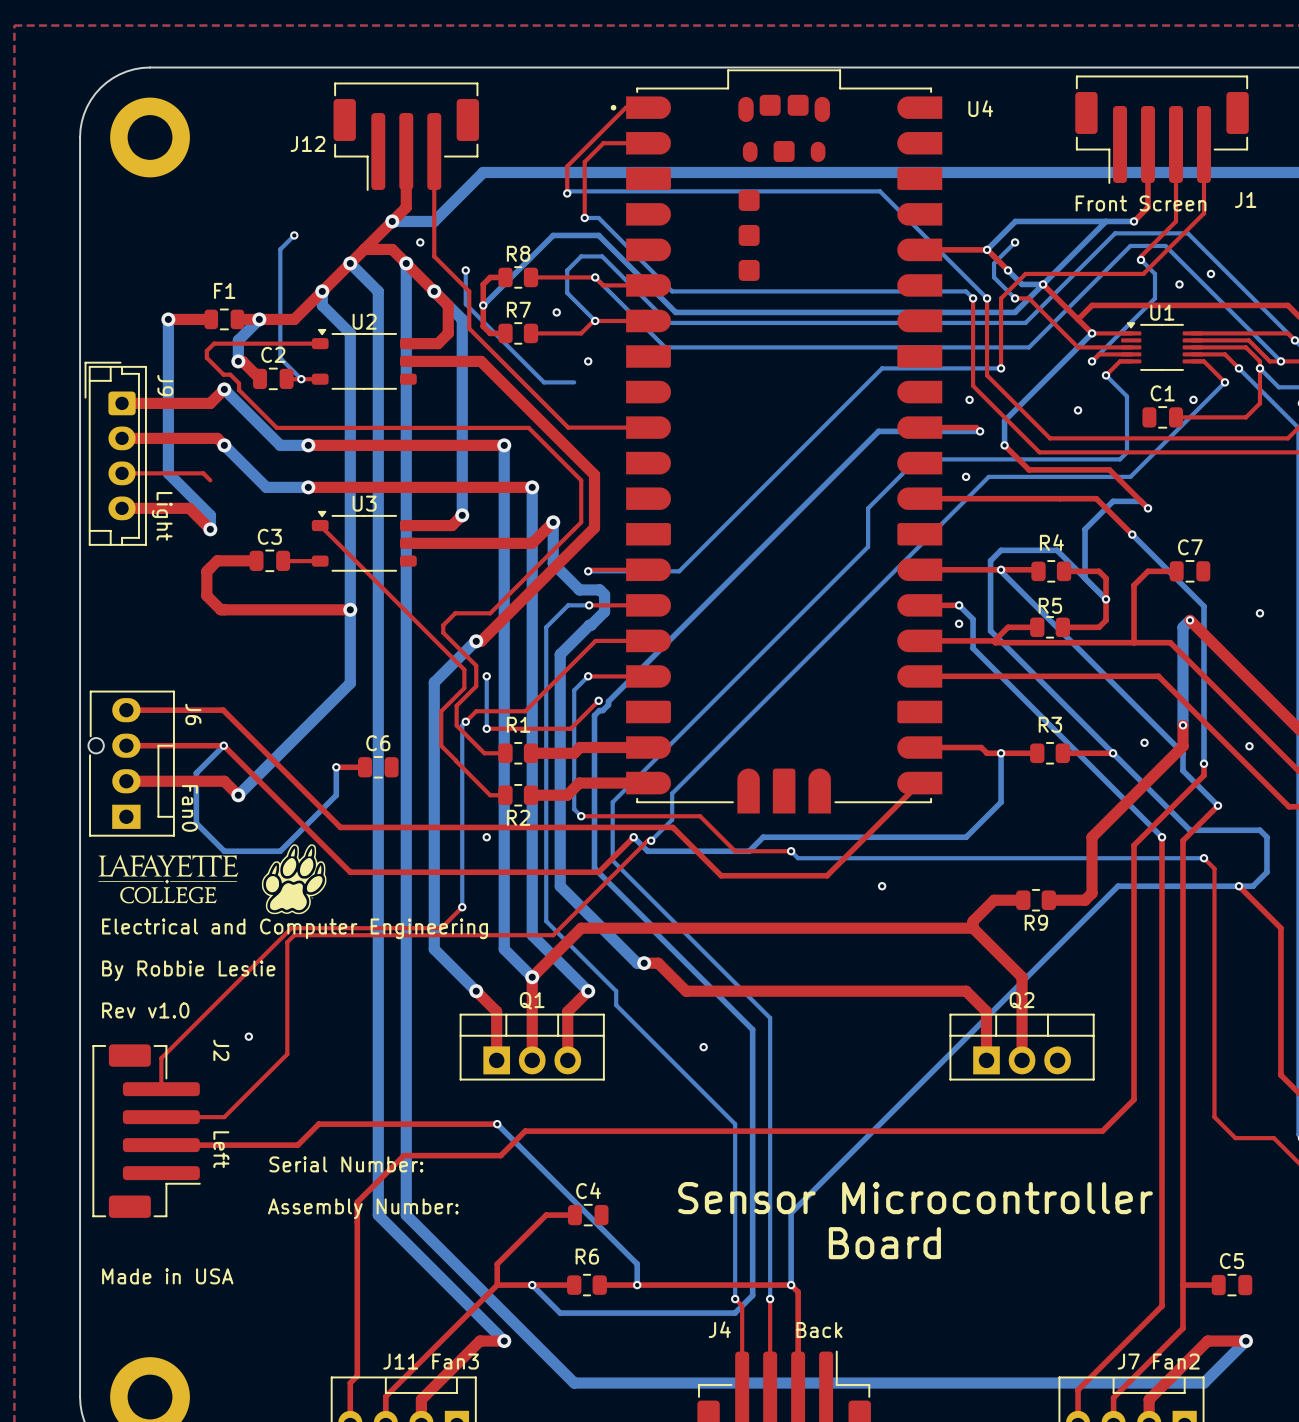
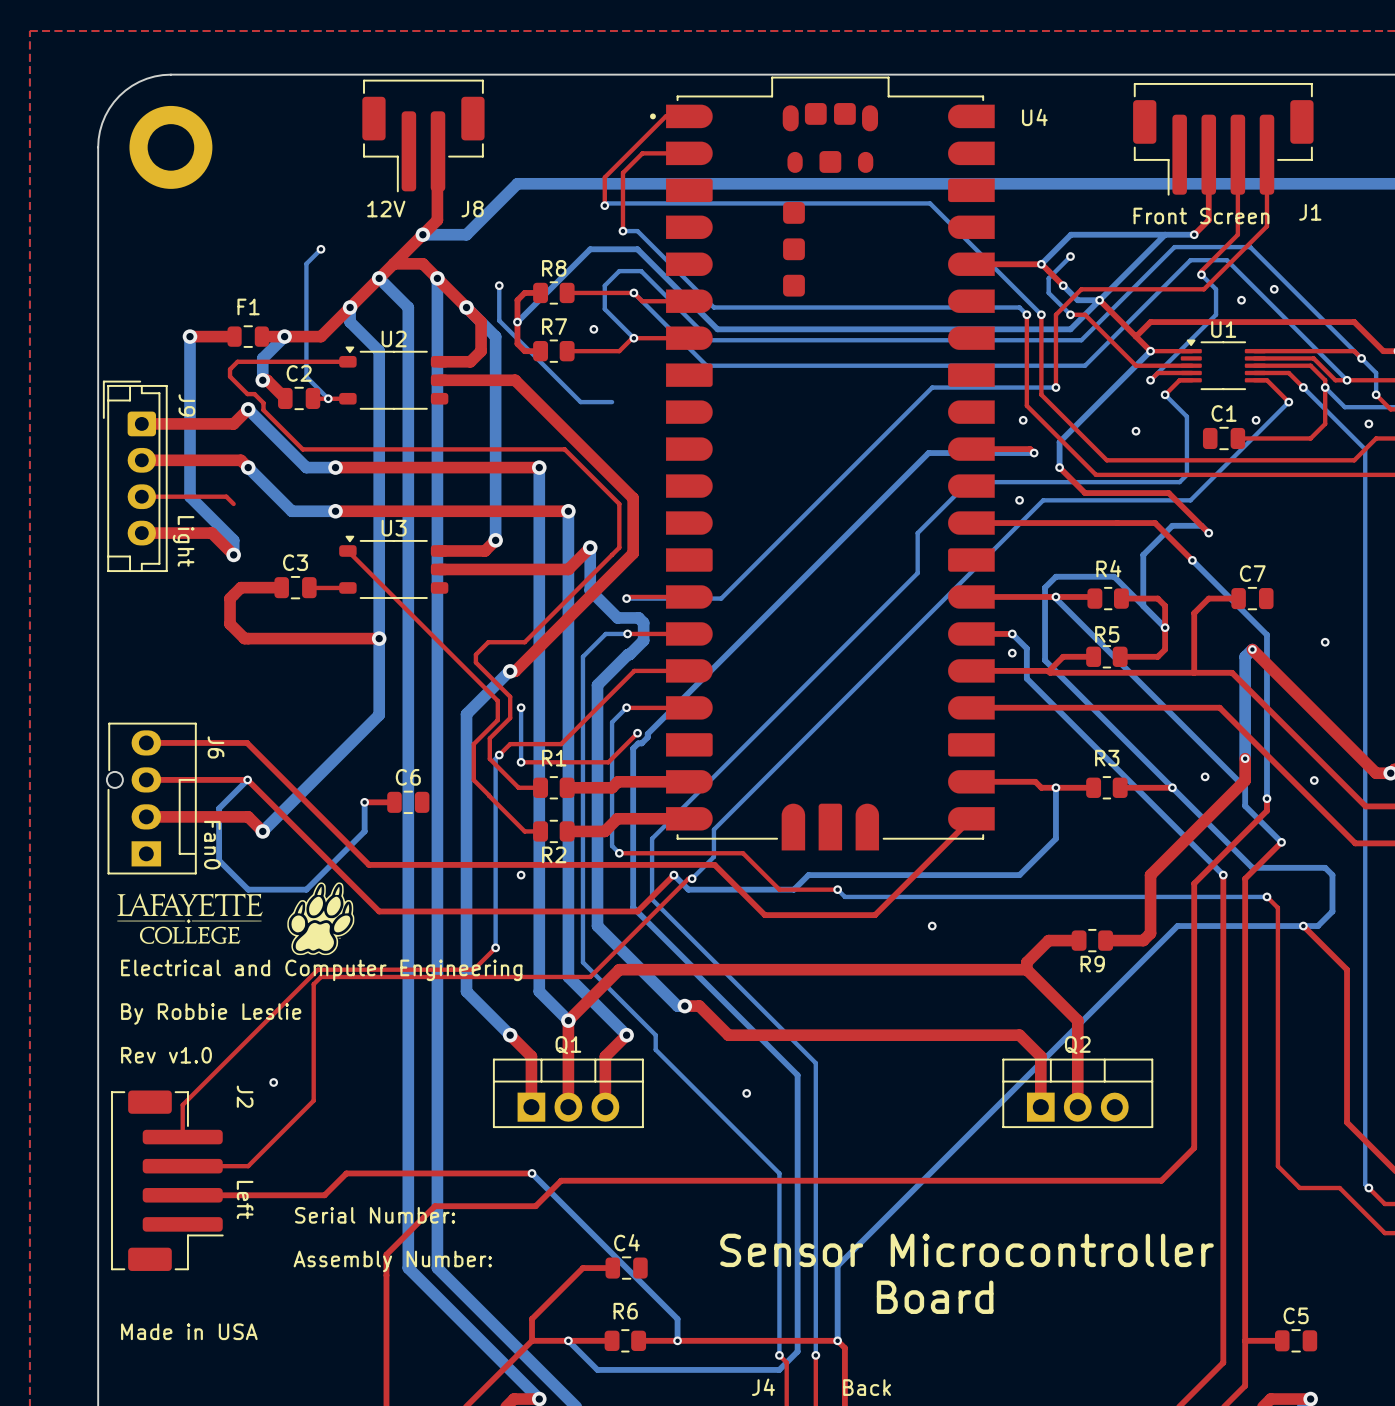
J8: none -> (423, 135)
J12: (406, 136) -> none
top track: (434, 151) (434, 256) (469, 291) (469, 328) (568, 427) (648, 427) -> none
via: (420, 242) -> none
via: (588, 361) -> none

